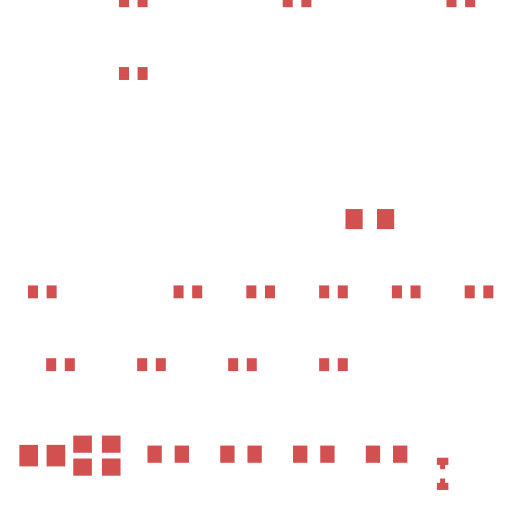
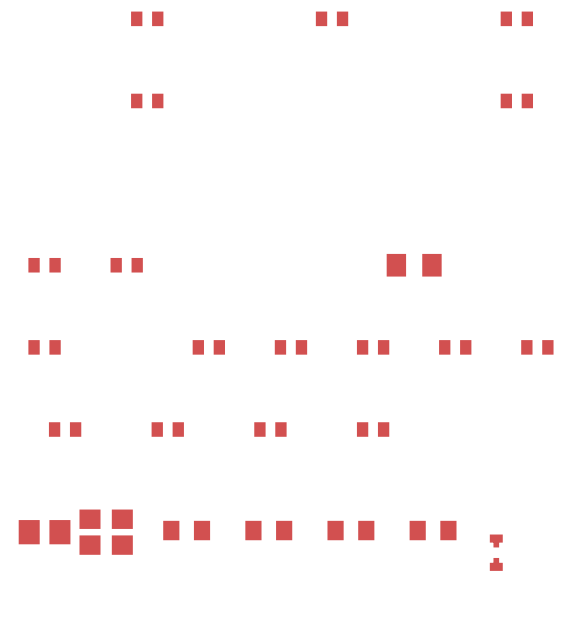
part: none -> (516, 100)
part: none -> (44, 265)
part: none -> (126, 265)

